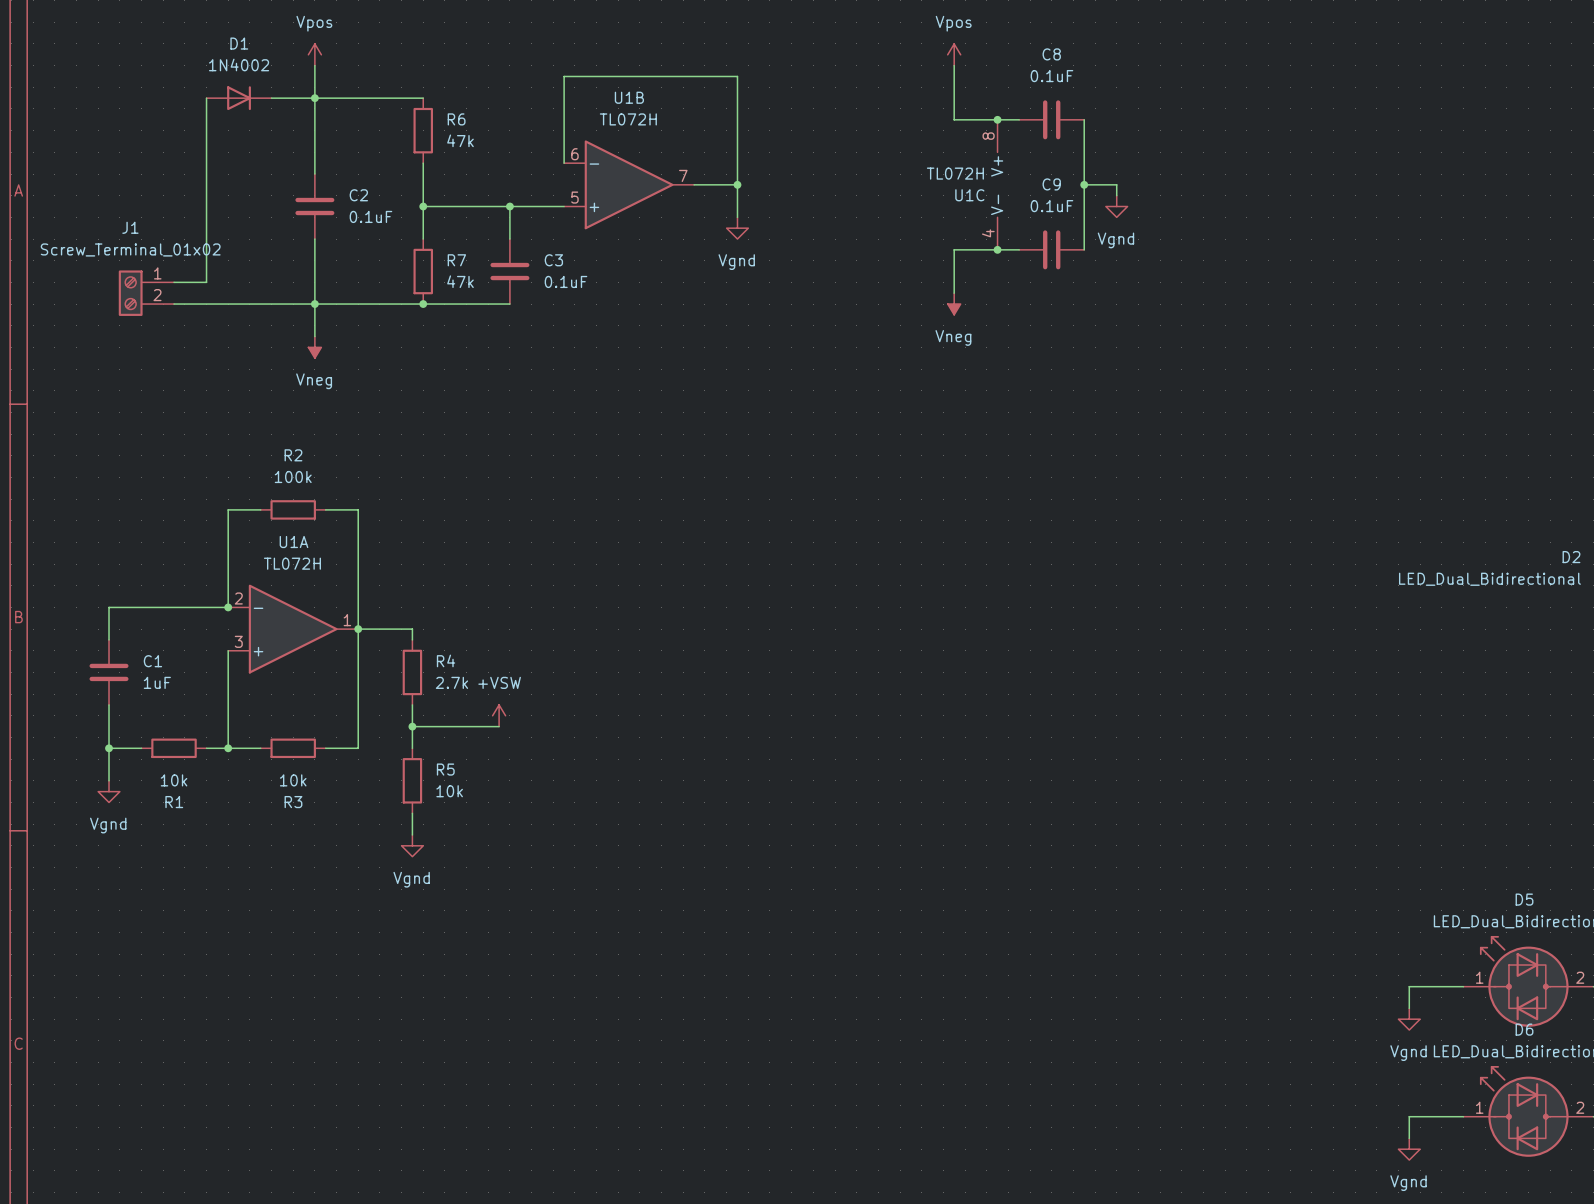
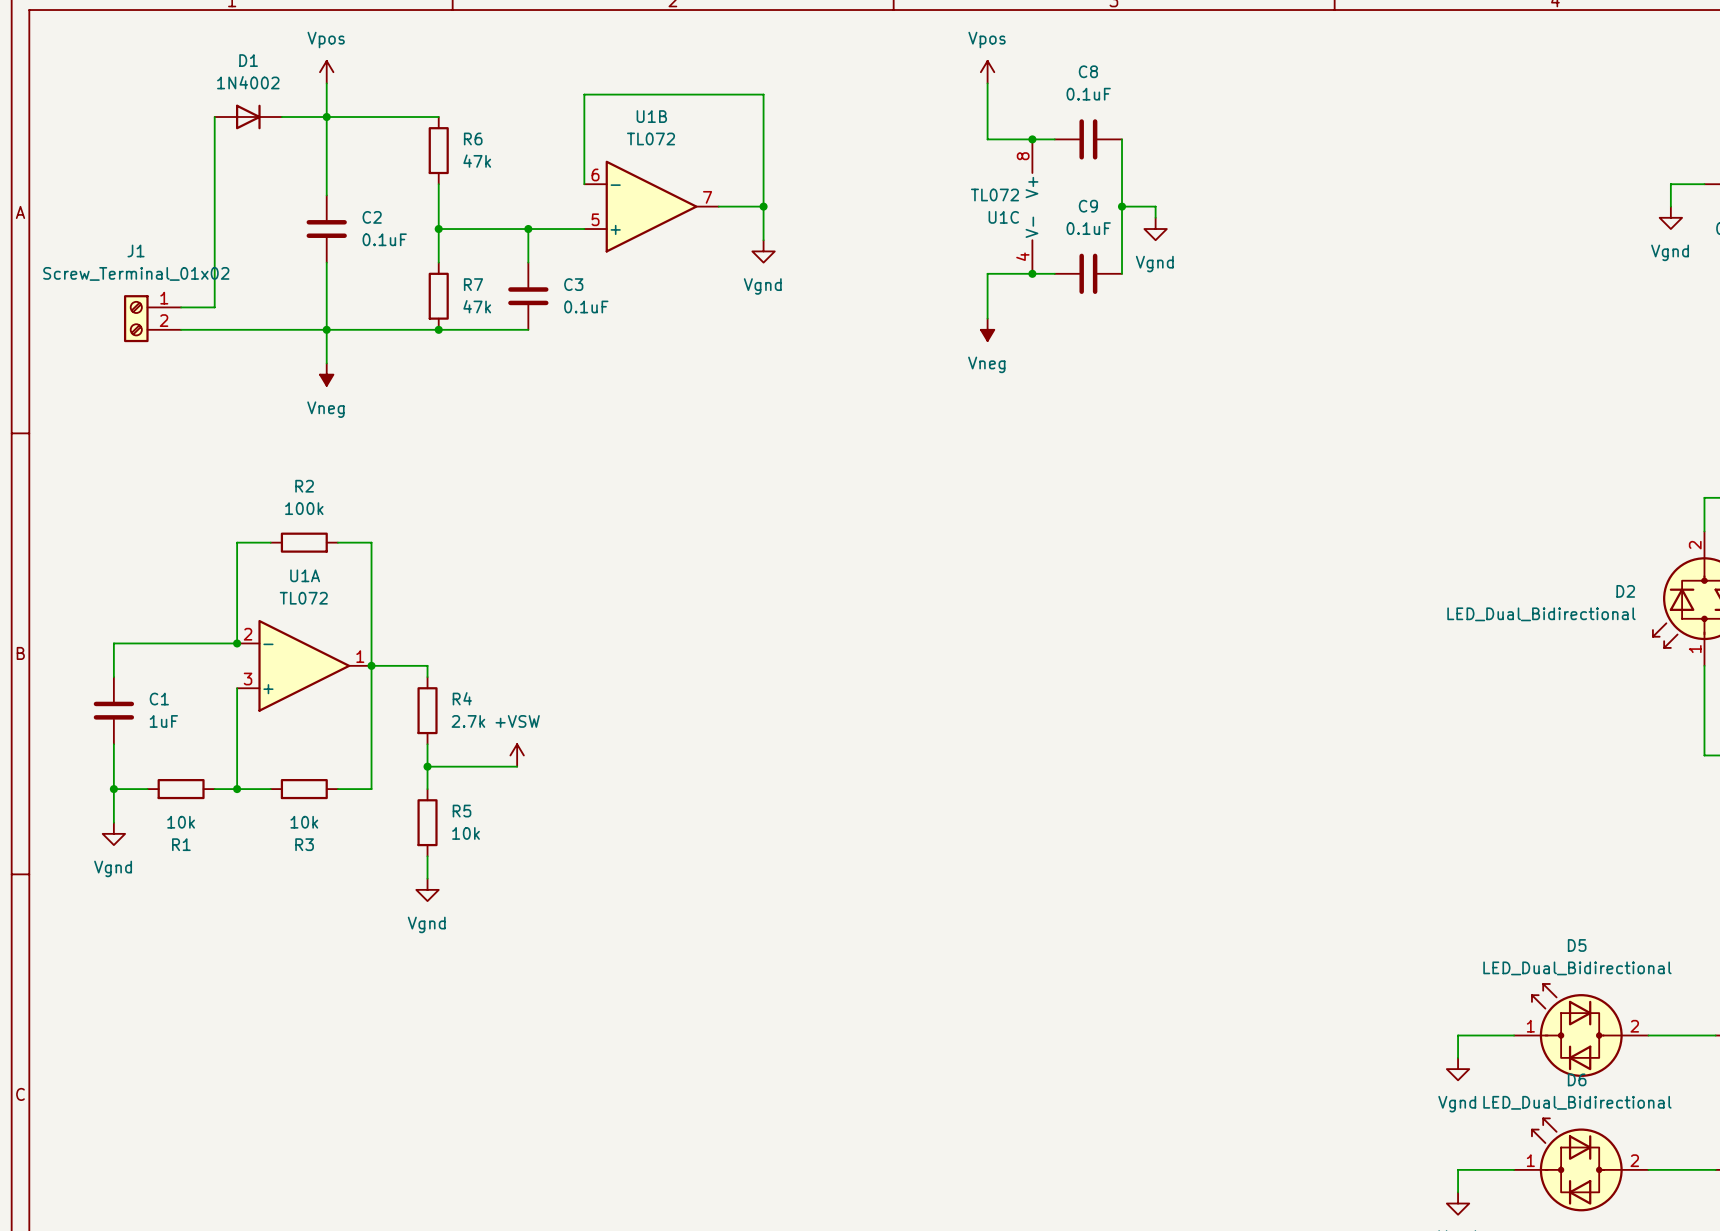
U1B value: TL072H (628, 119) -> TL072 (651, 138)
U1C value: TL072H (955, 173) -> TL072 (994, 194)
U1A value: TL072H (292, 563) -> TL072 (303, 598)

